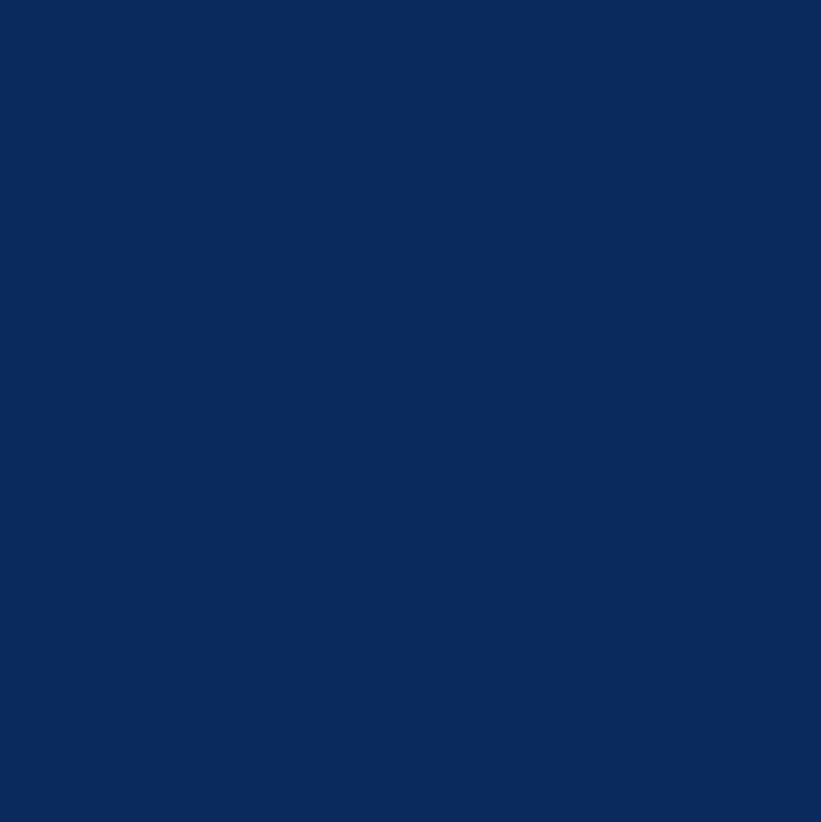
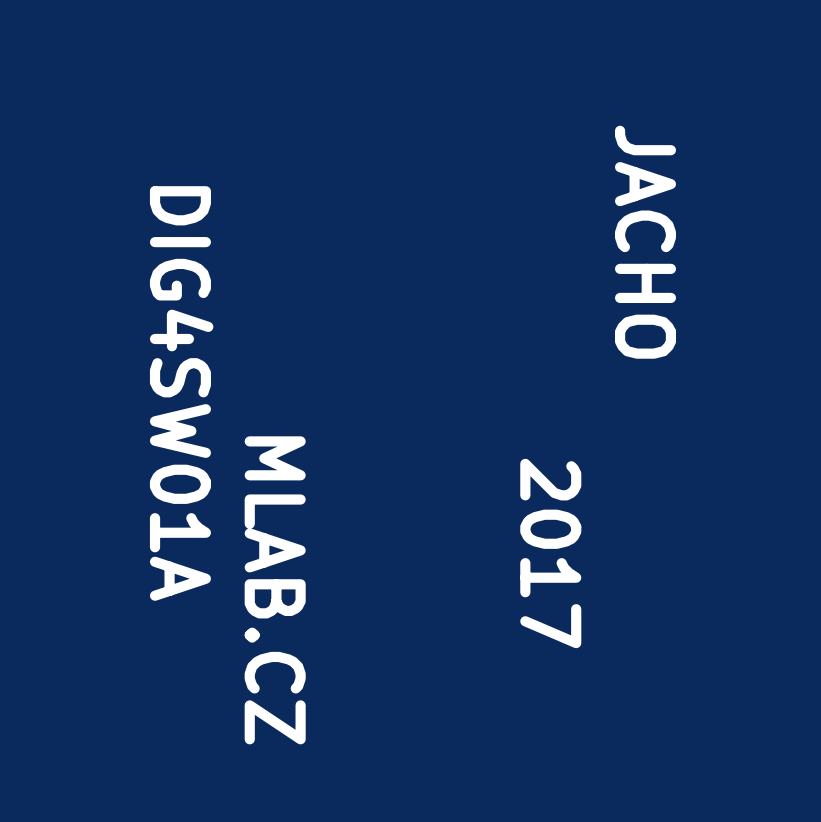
text: none -> JACHO (645, 242)
text: none -> DIG4SW01A (181, 393)
text: none -> 2017 (550, 553)
text: none -> MLAB.CZ (275, 590)

